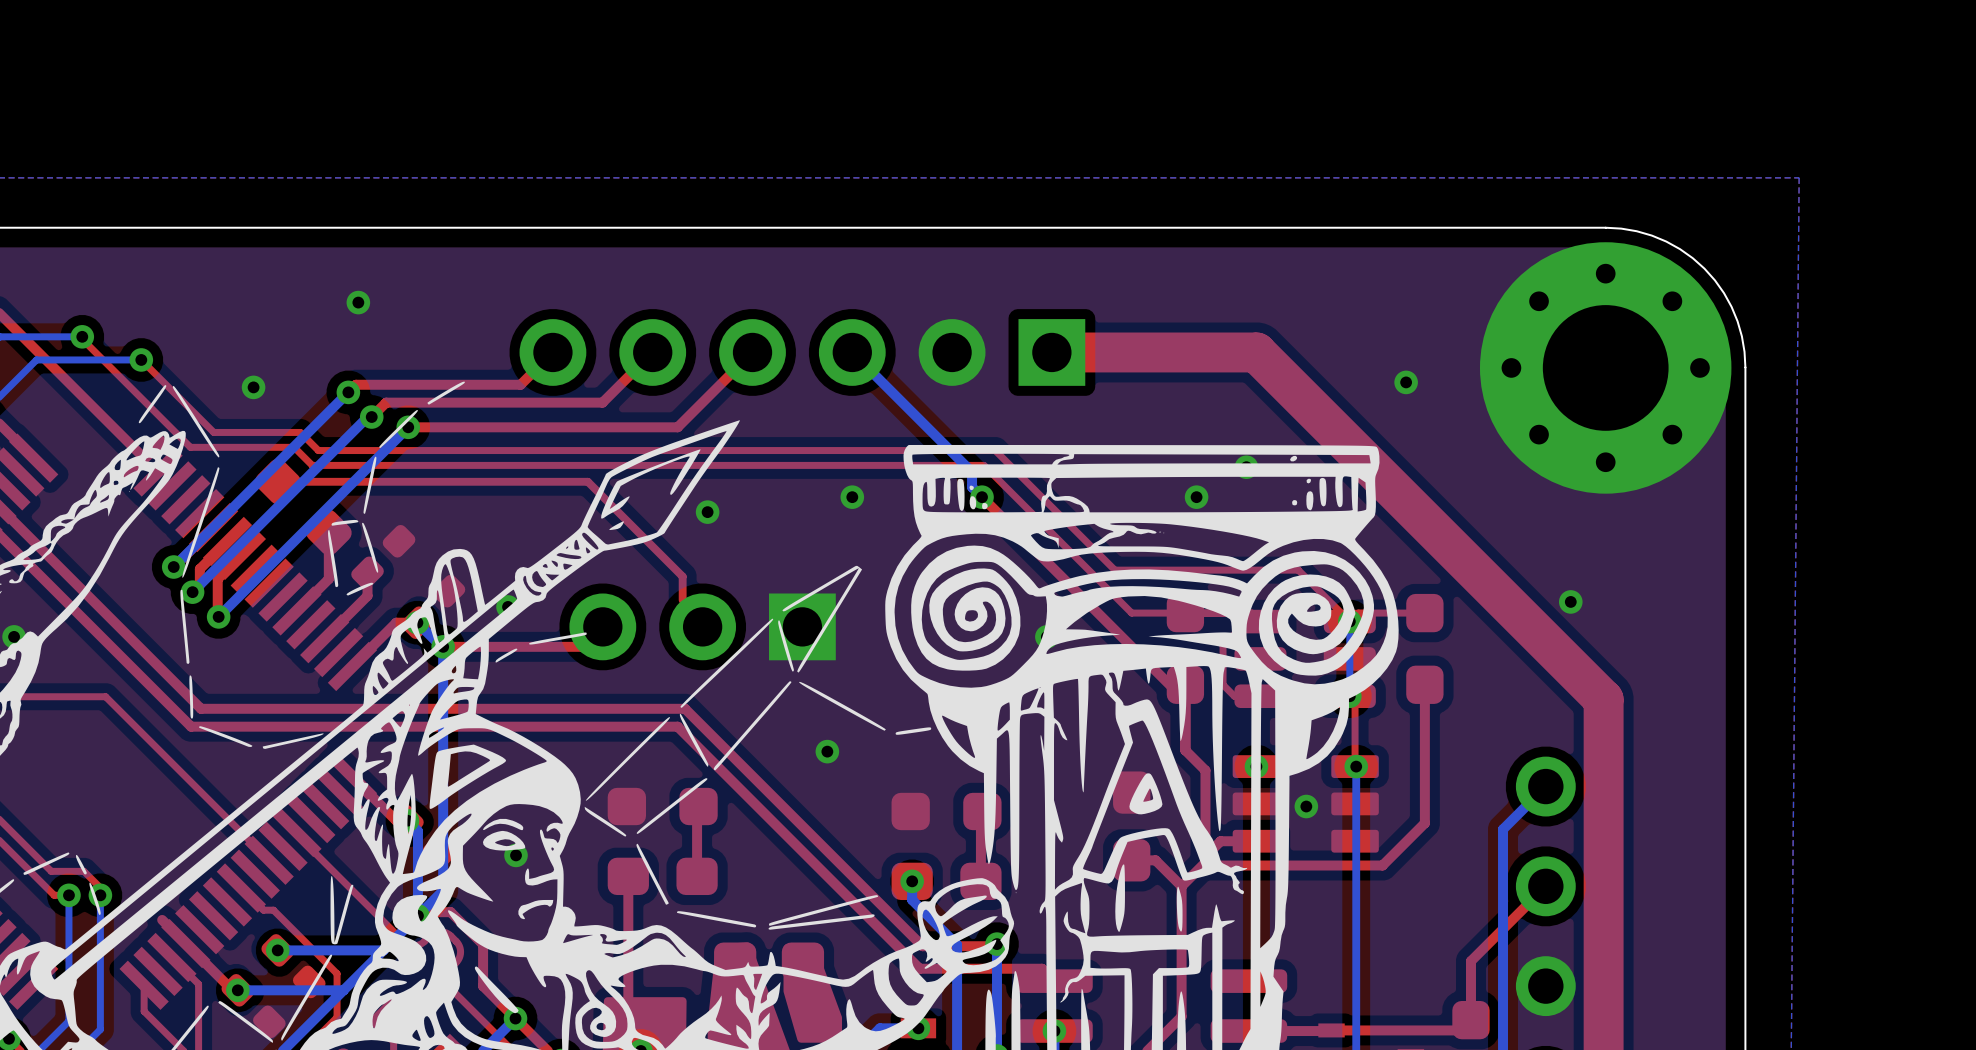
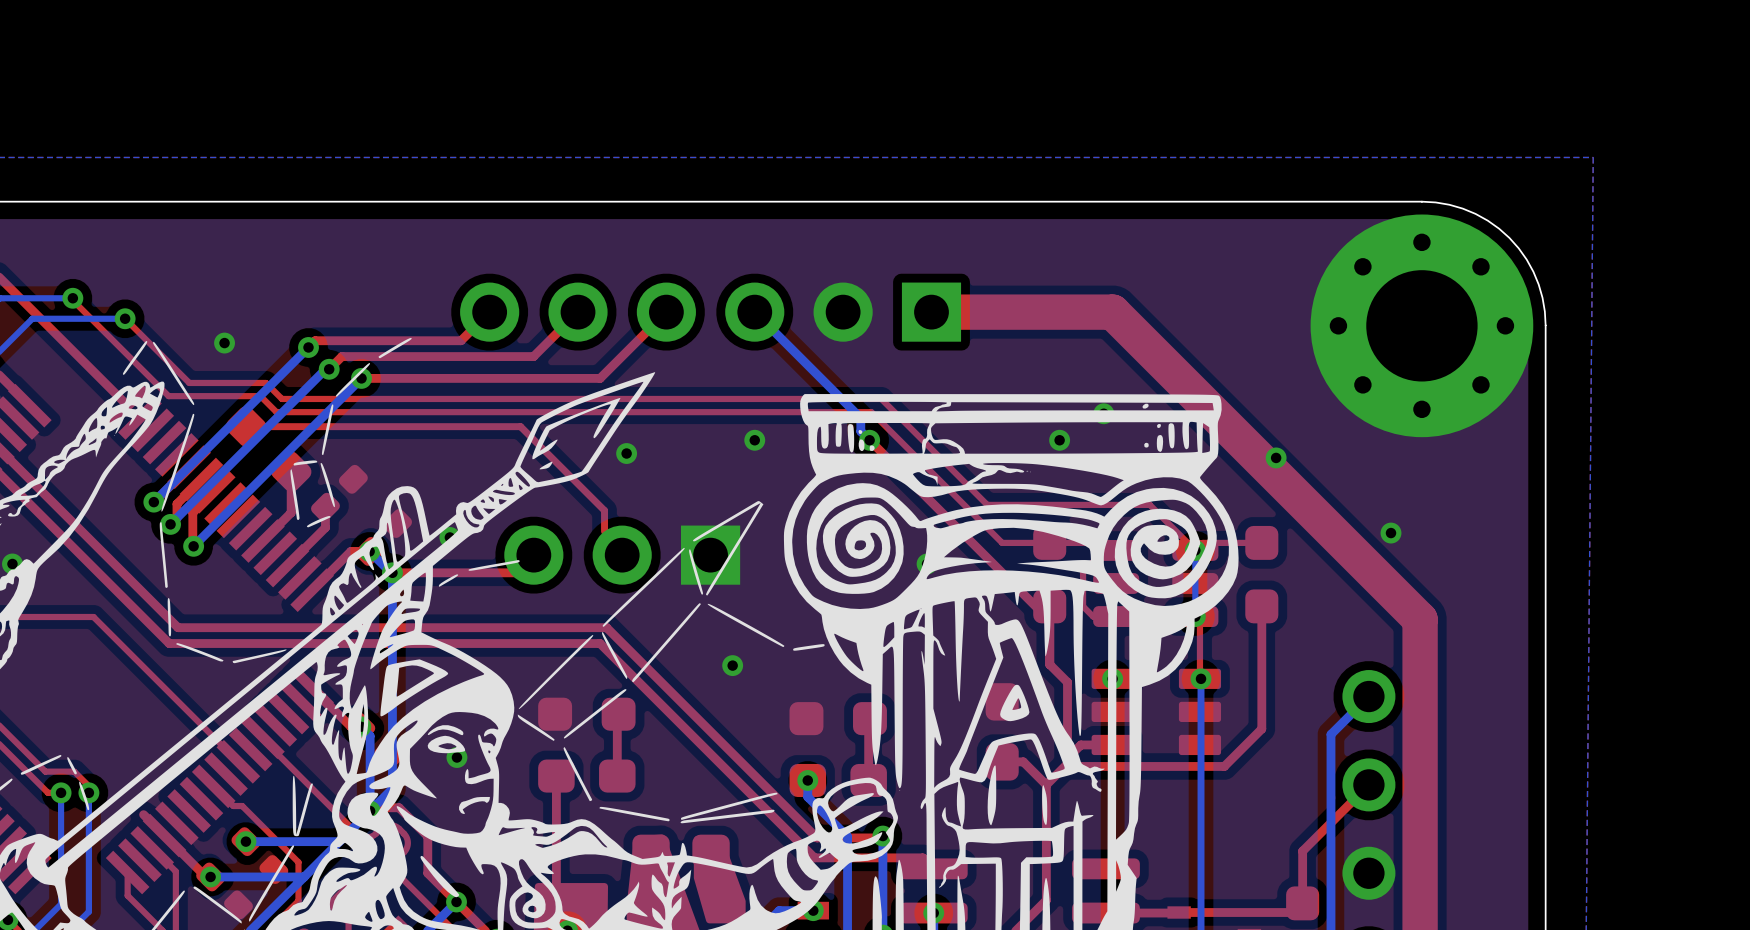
via: (358, 302) -> none
via position: (1406, 382) -> (1276, 457)
via: (1306, 806) -> none

